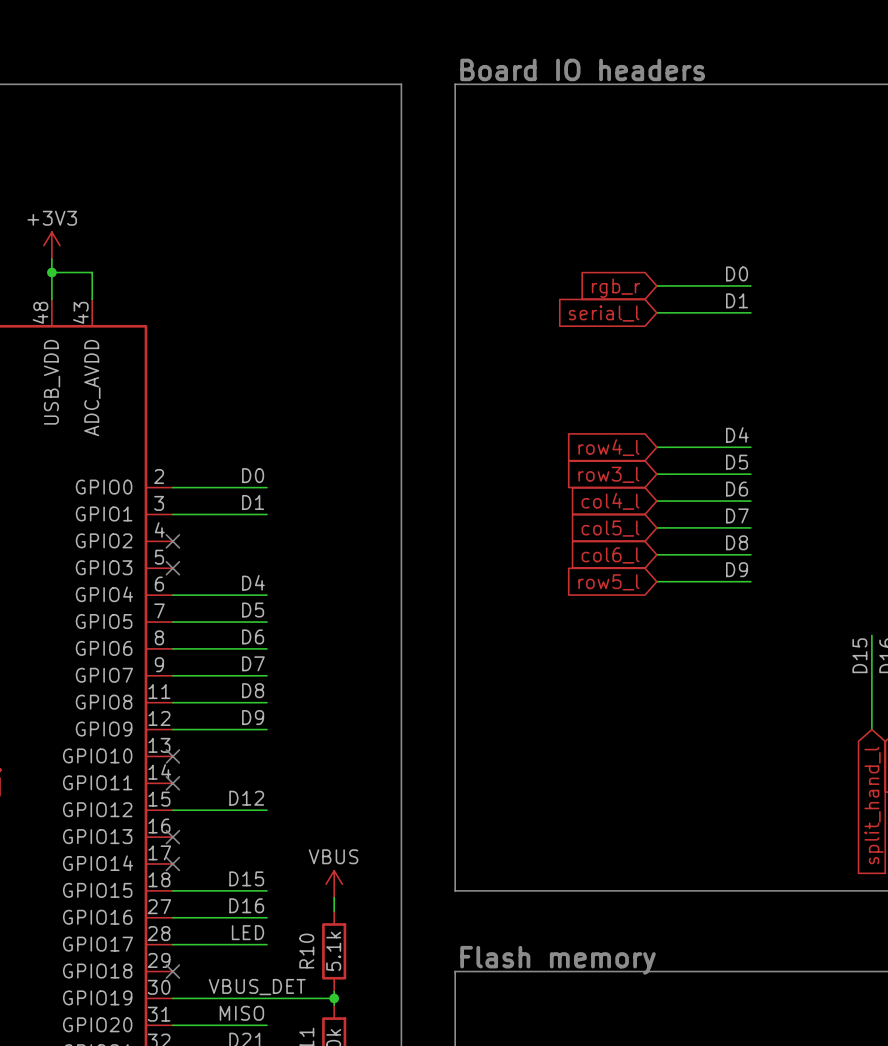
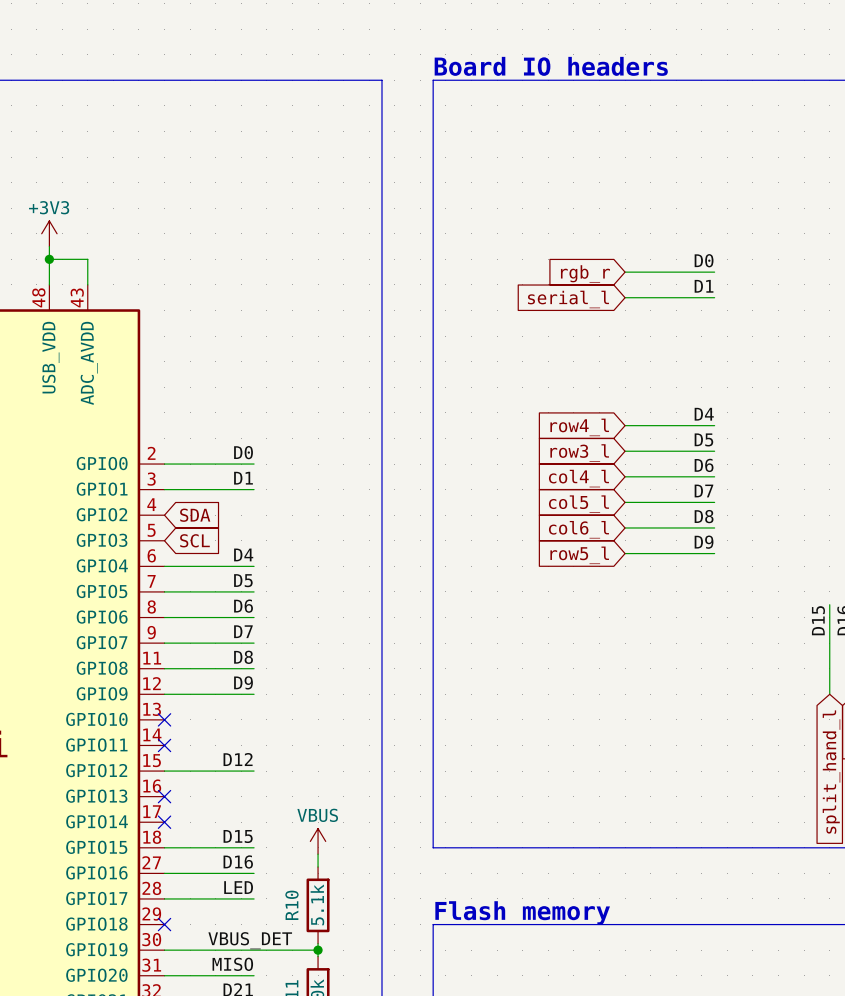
no-connect mark: (172, 541) -> none
global label: none -> SDA (195, 515)
no-connect mark: (172, 568) -> none
global label: none -> SCL (194, 540)

